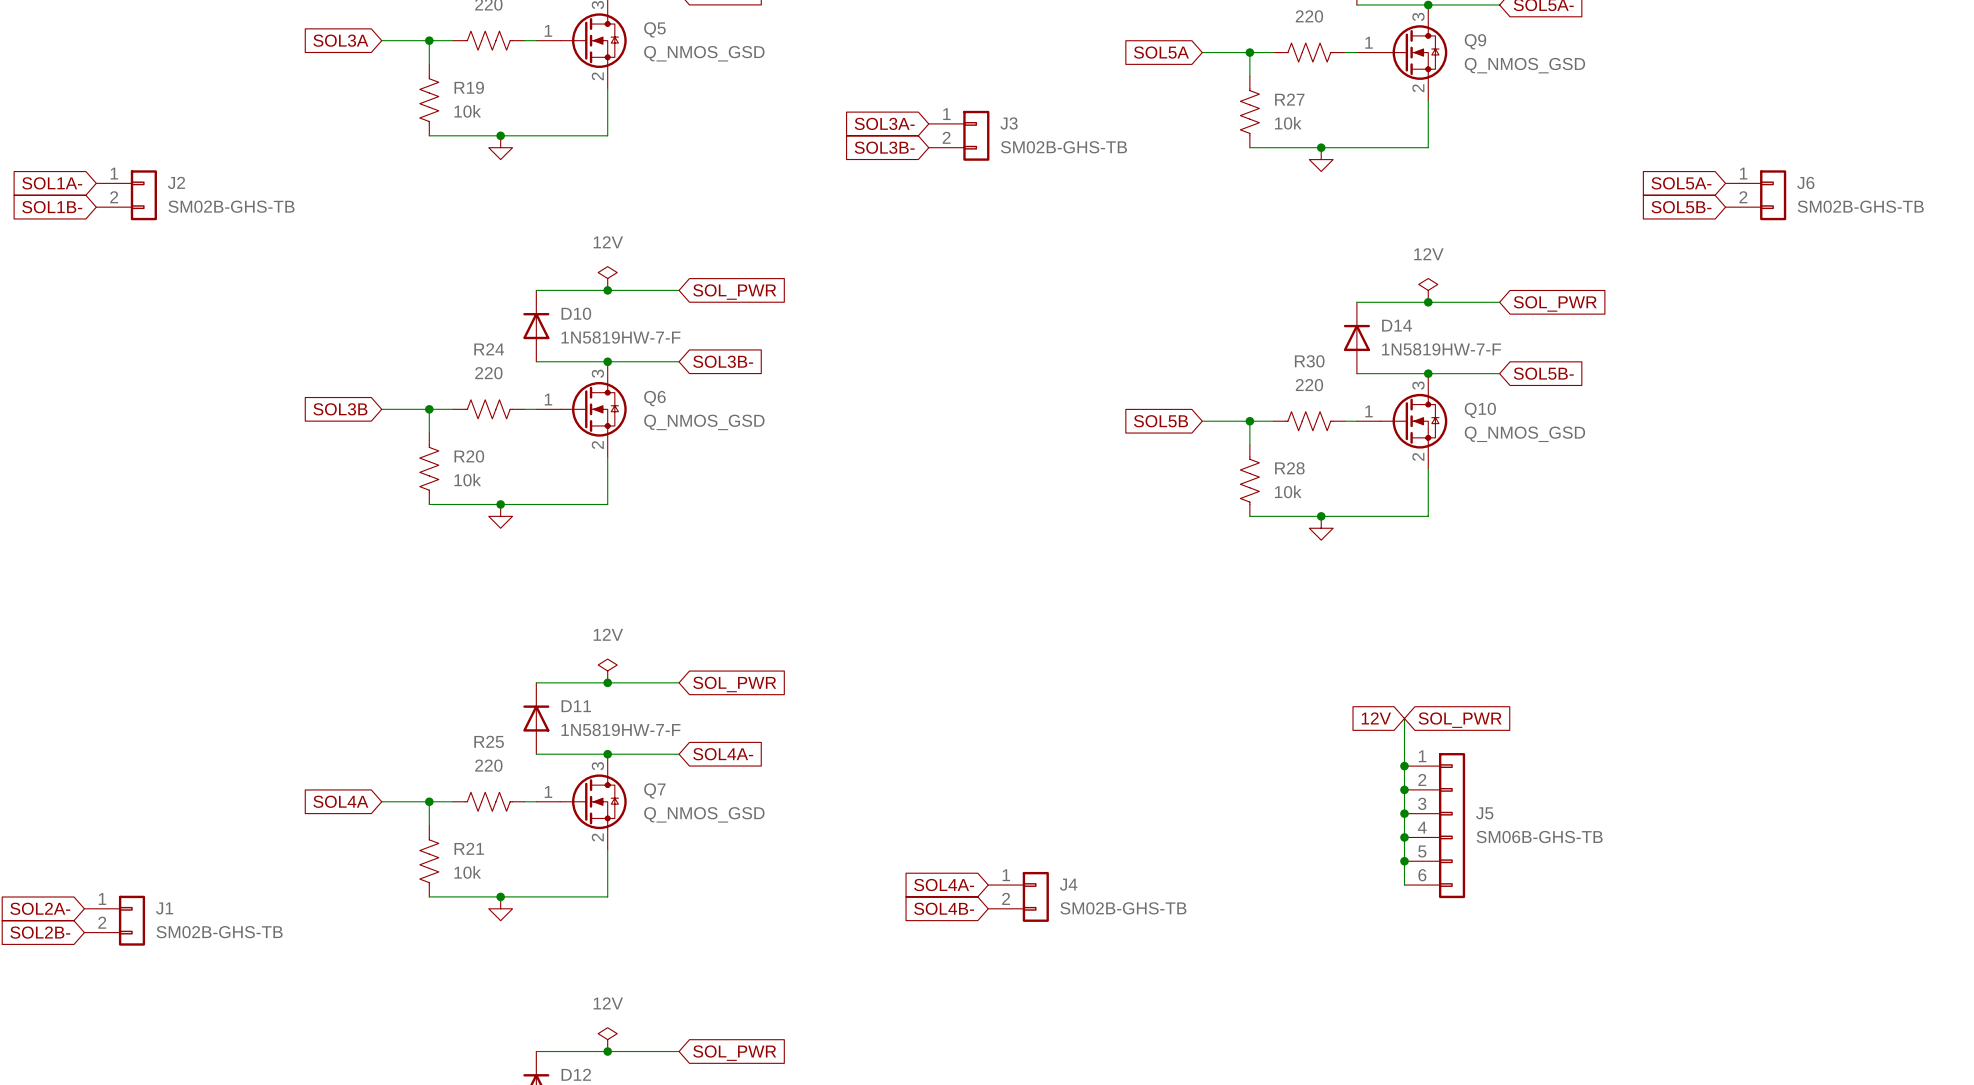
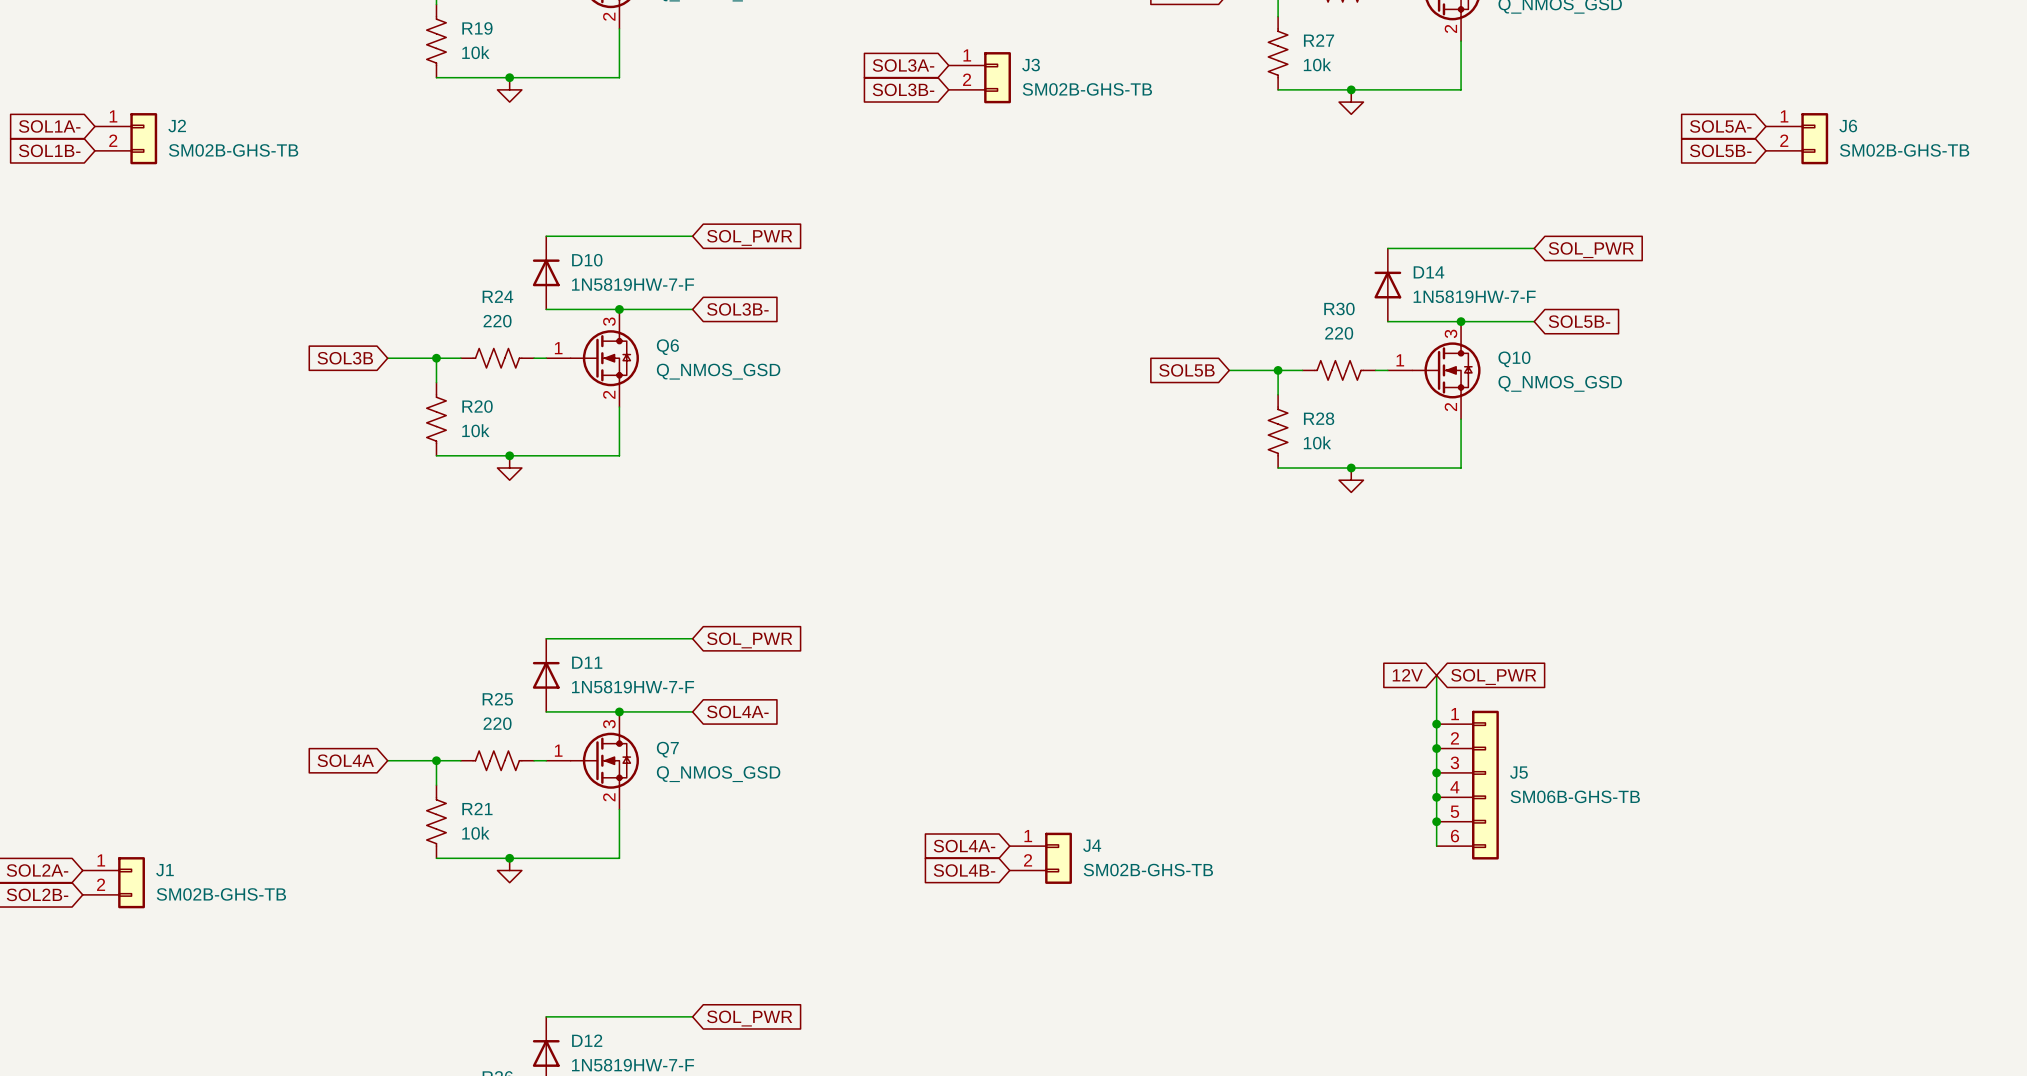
power symbol: 12V (607, 278) -> none
junction: (607, 290) -> none
power symbol: 12V (1428, 290) -> none
junction: (1428, 302) -> none
power symbol: 12V (607, 670) -> none
junction: (607, 682) -> none
power symbol: 12V (607, 1039) -> none
junction: (607, 1051) -> none

